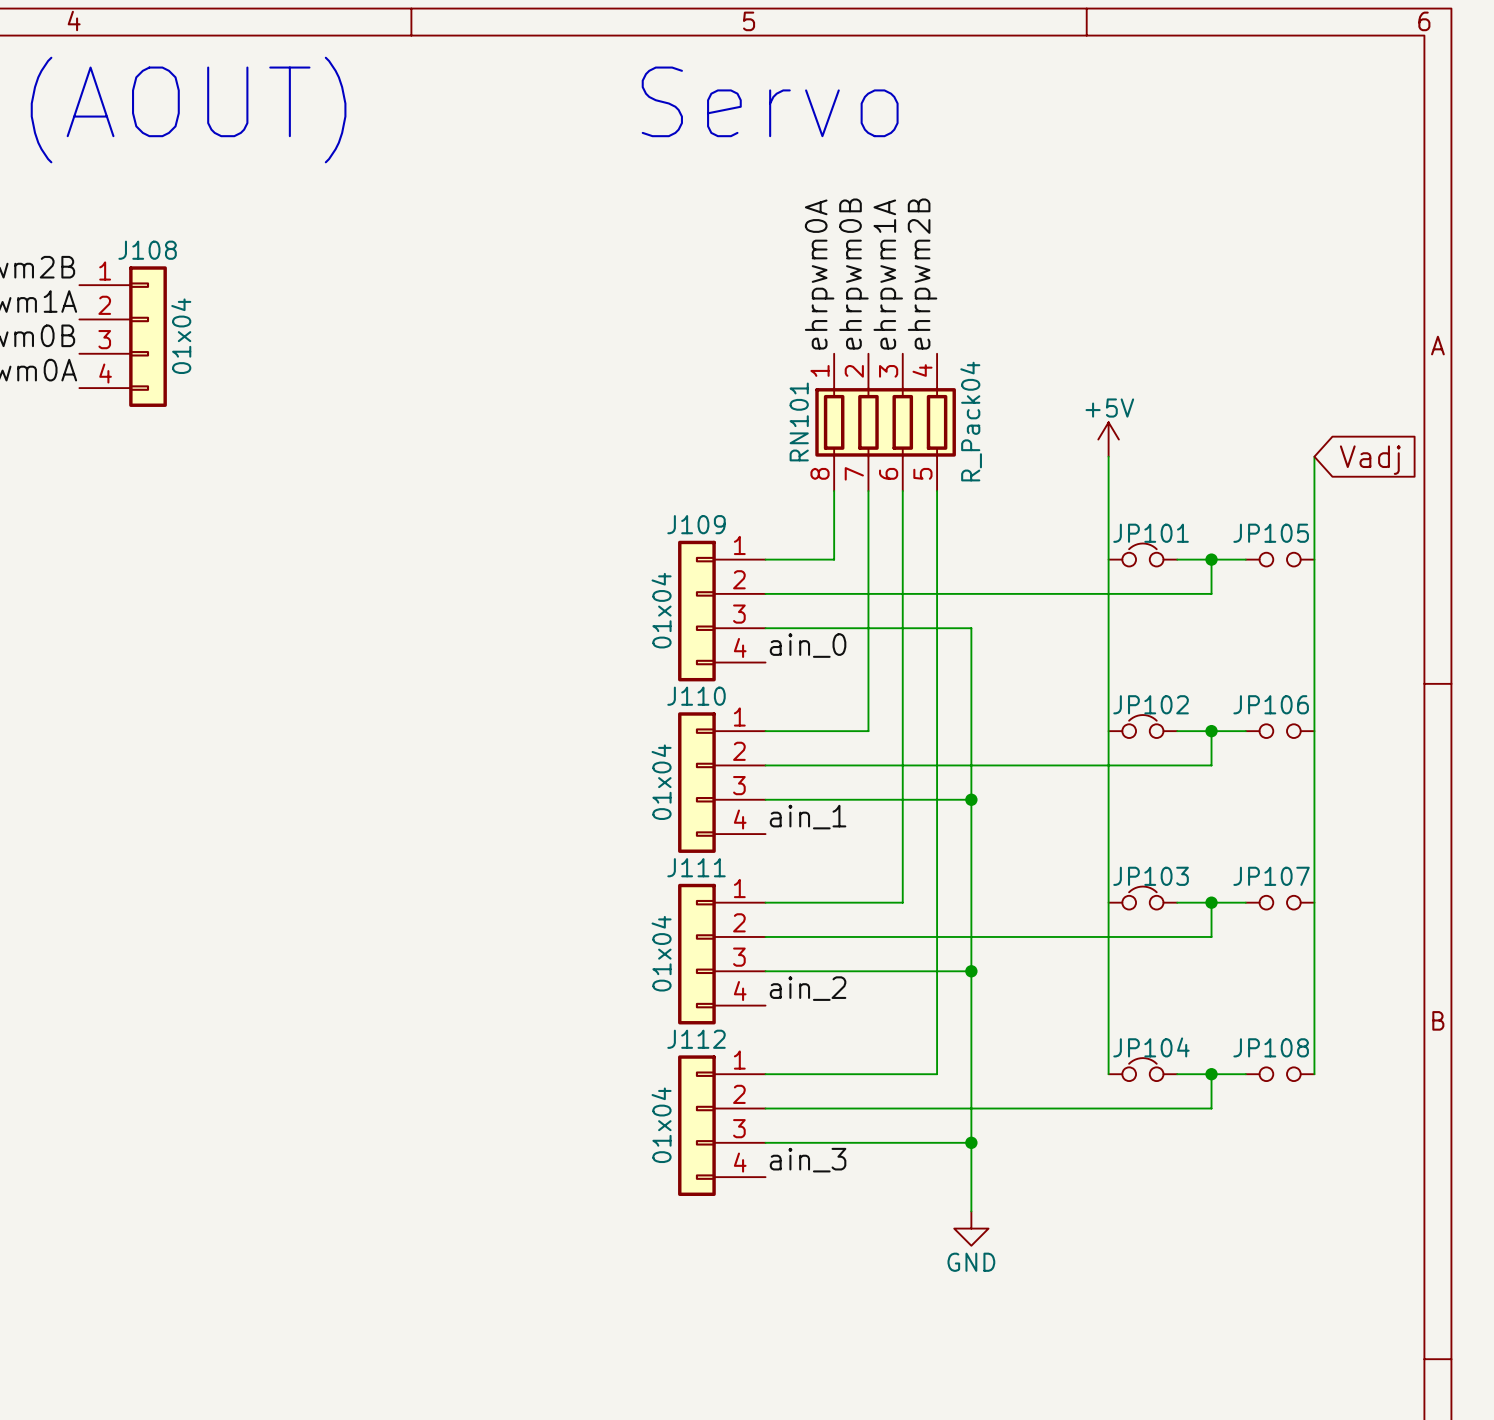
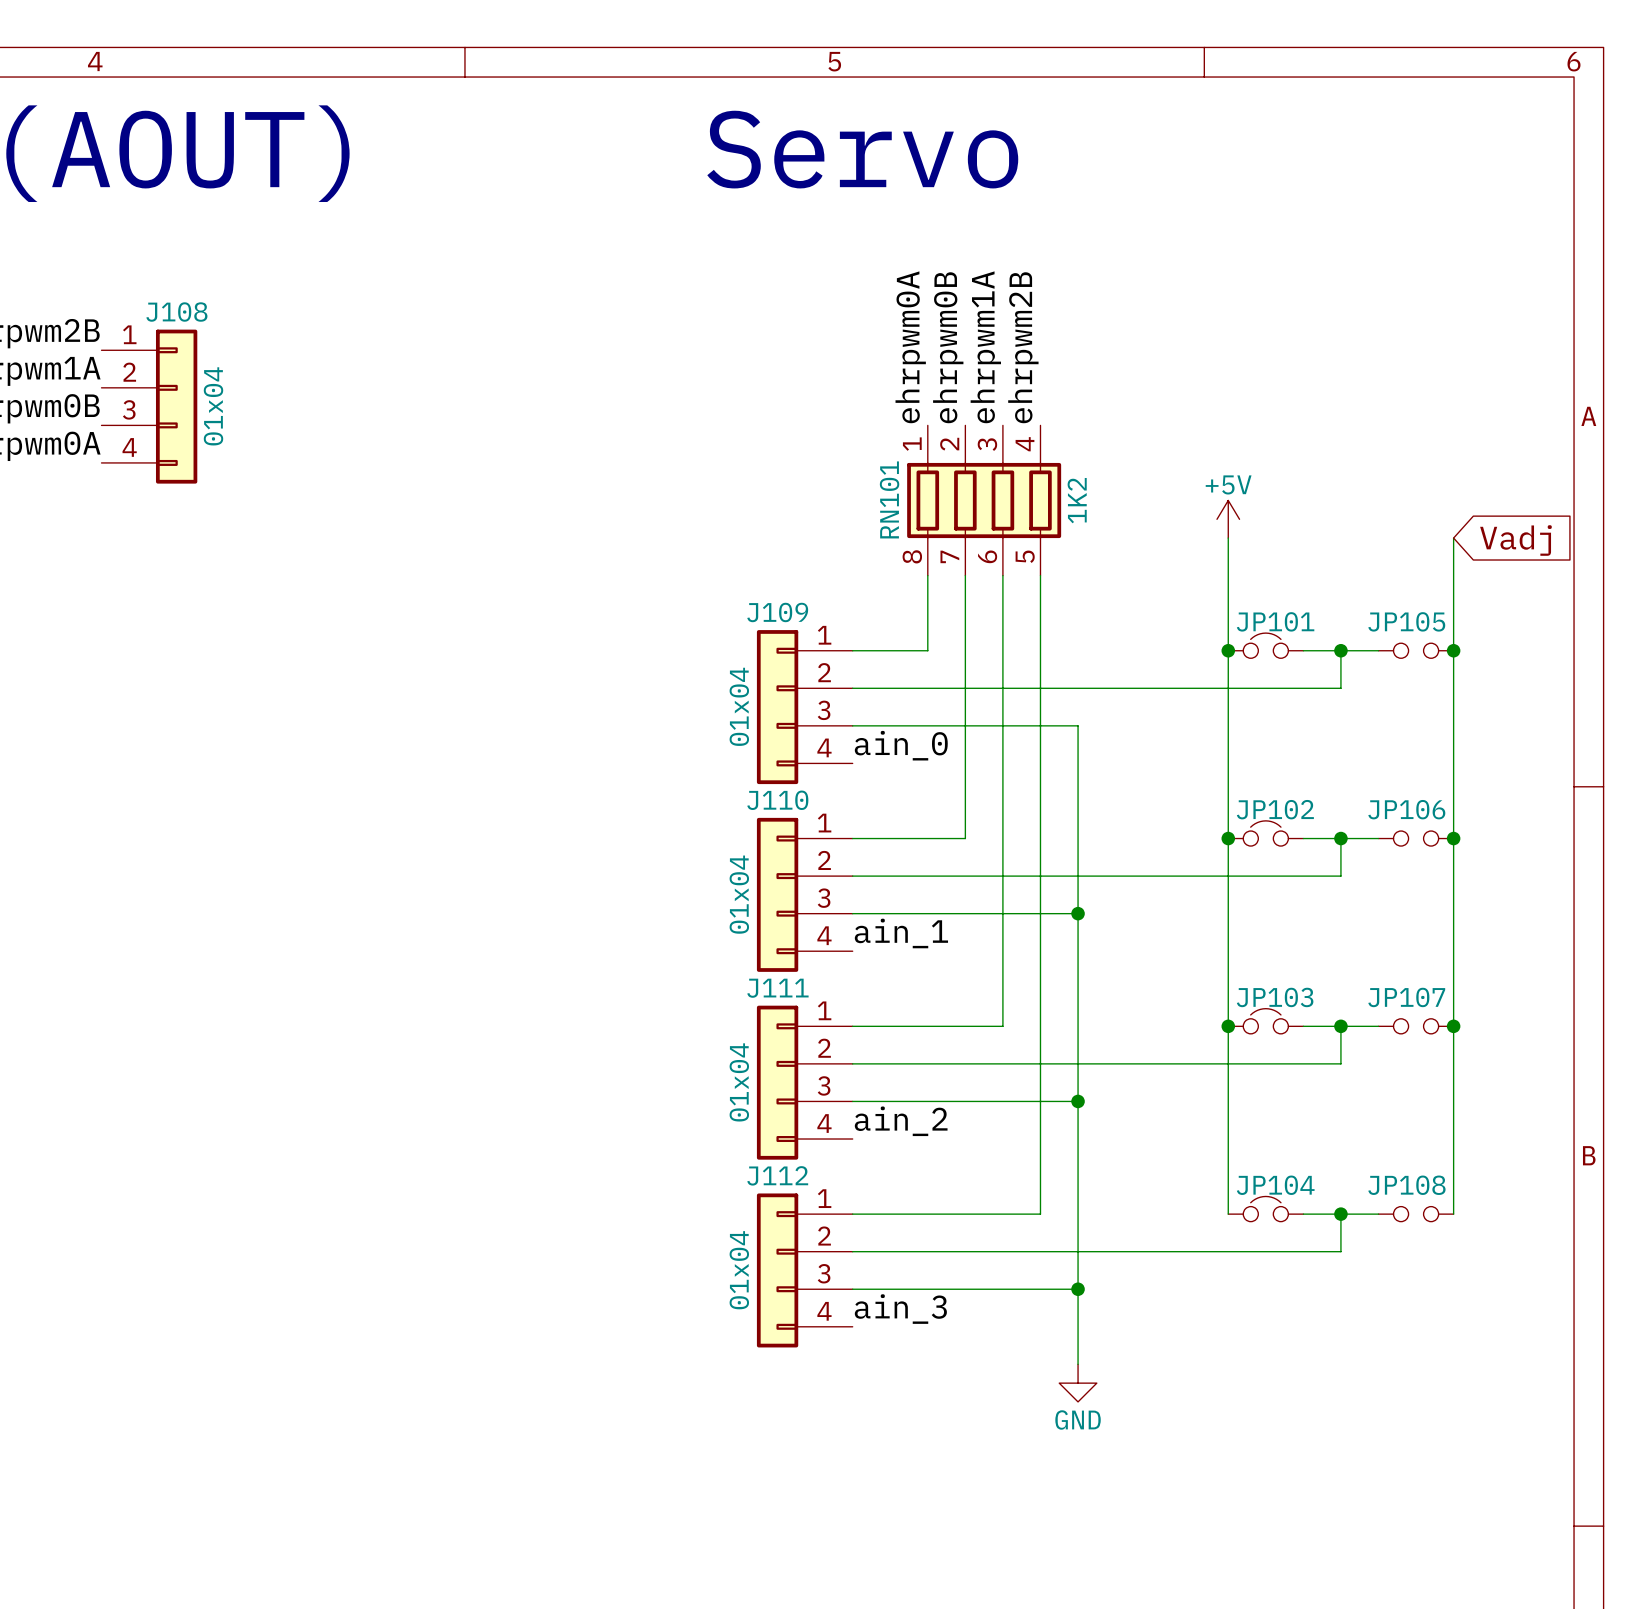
RN101 value: R_Pack04 (971, 421) -> 1K2 (1077, 500)
junction: none -> (1228, 650)
junction: none -> (1453, 650)
junction: none -> (1228, 838)
junction: none -> (1453, 838)
junction: none -> (1228, 1026)
junction: none -> (1453, 1026)

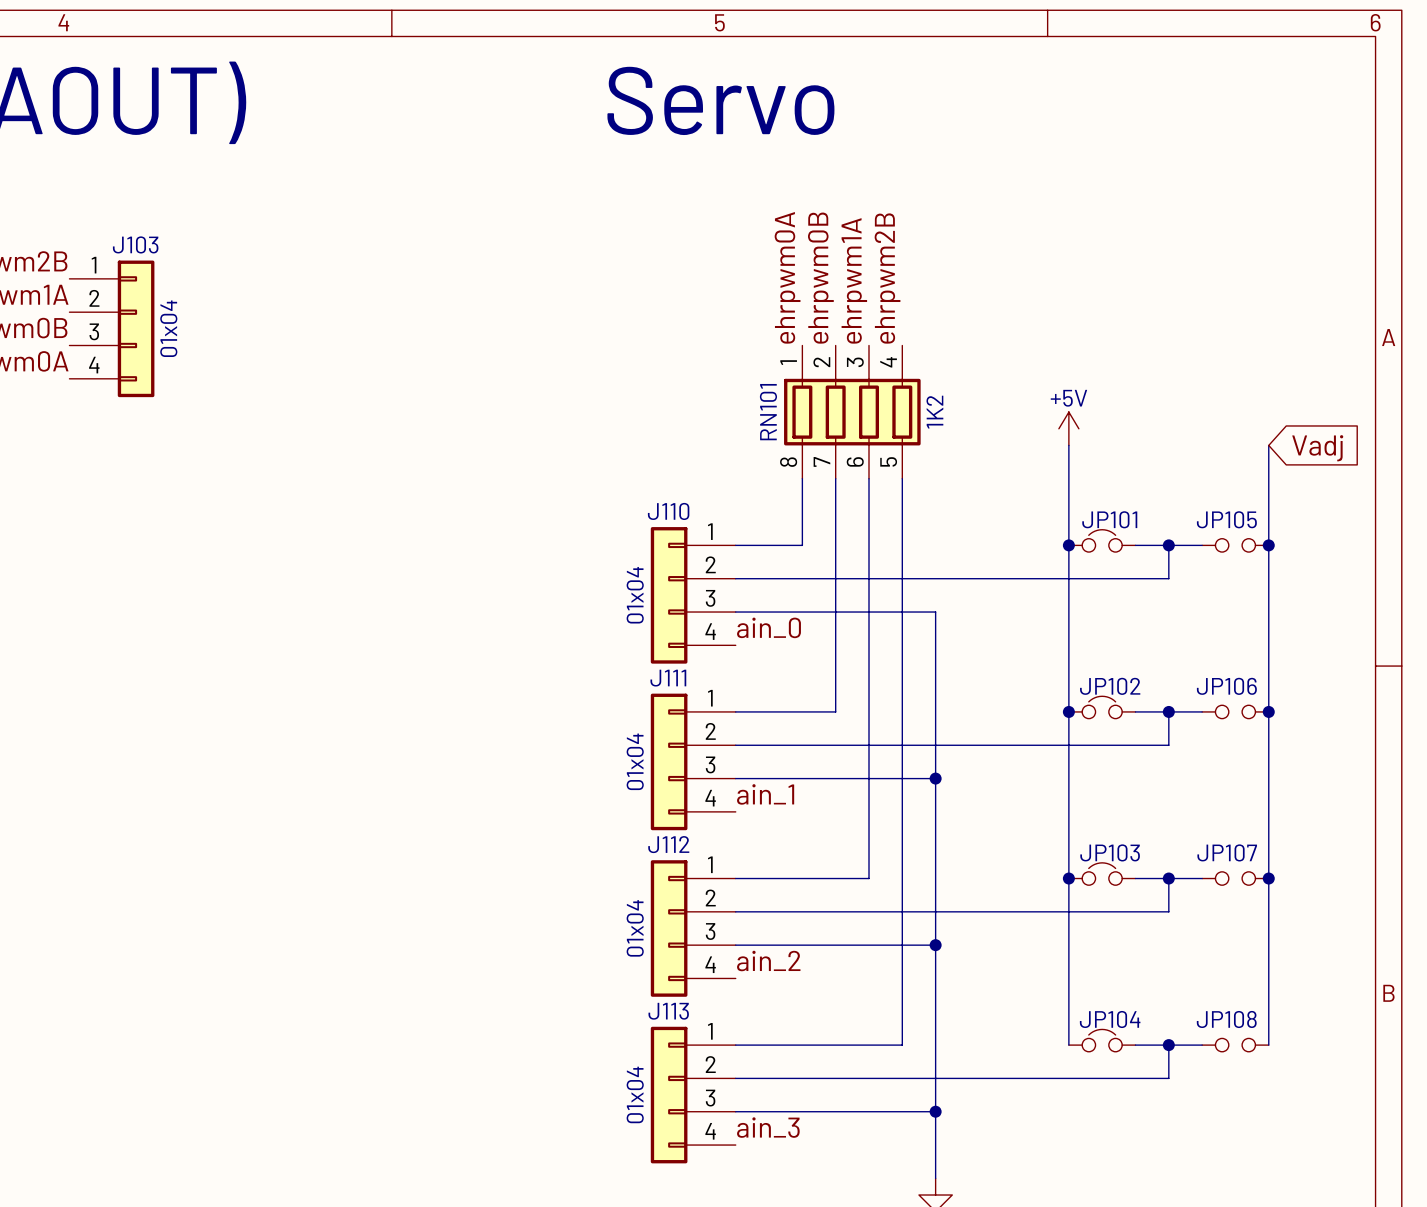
J108 name: J108 (176, 312) -> J103 (135, 244)
J109 name: J109 (777, 612) -> J110 (668, 511)
J110 name: J110 (777, 800) -> J111 (668, 678)
J111 name: J111 (777, 988) -> J112 (668, 844)
J112 name: J112 (777, 1175) -> J113 (668, 1011)

